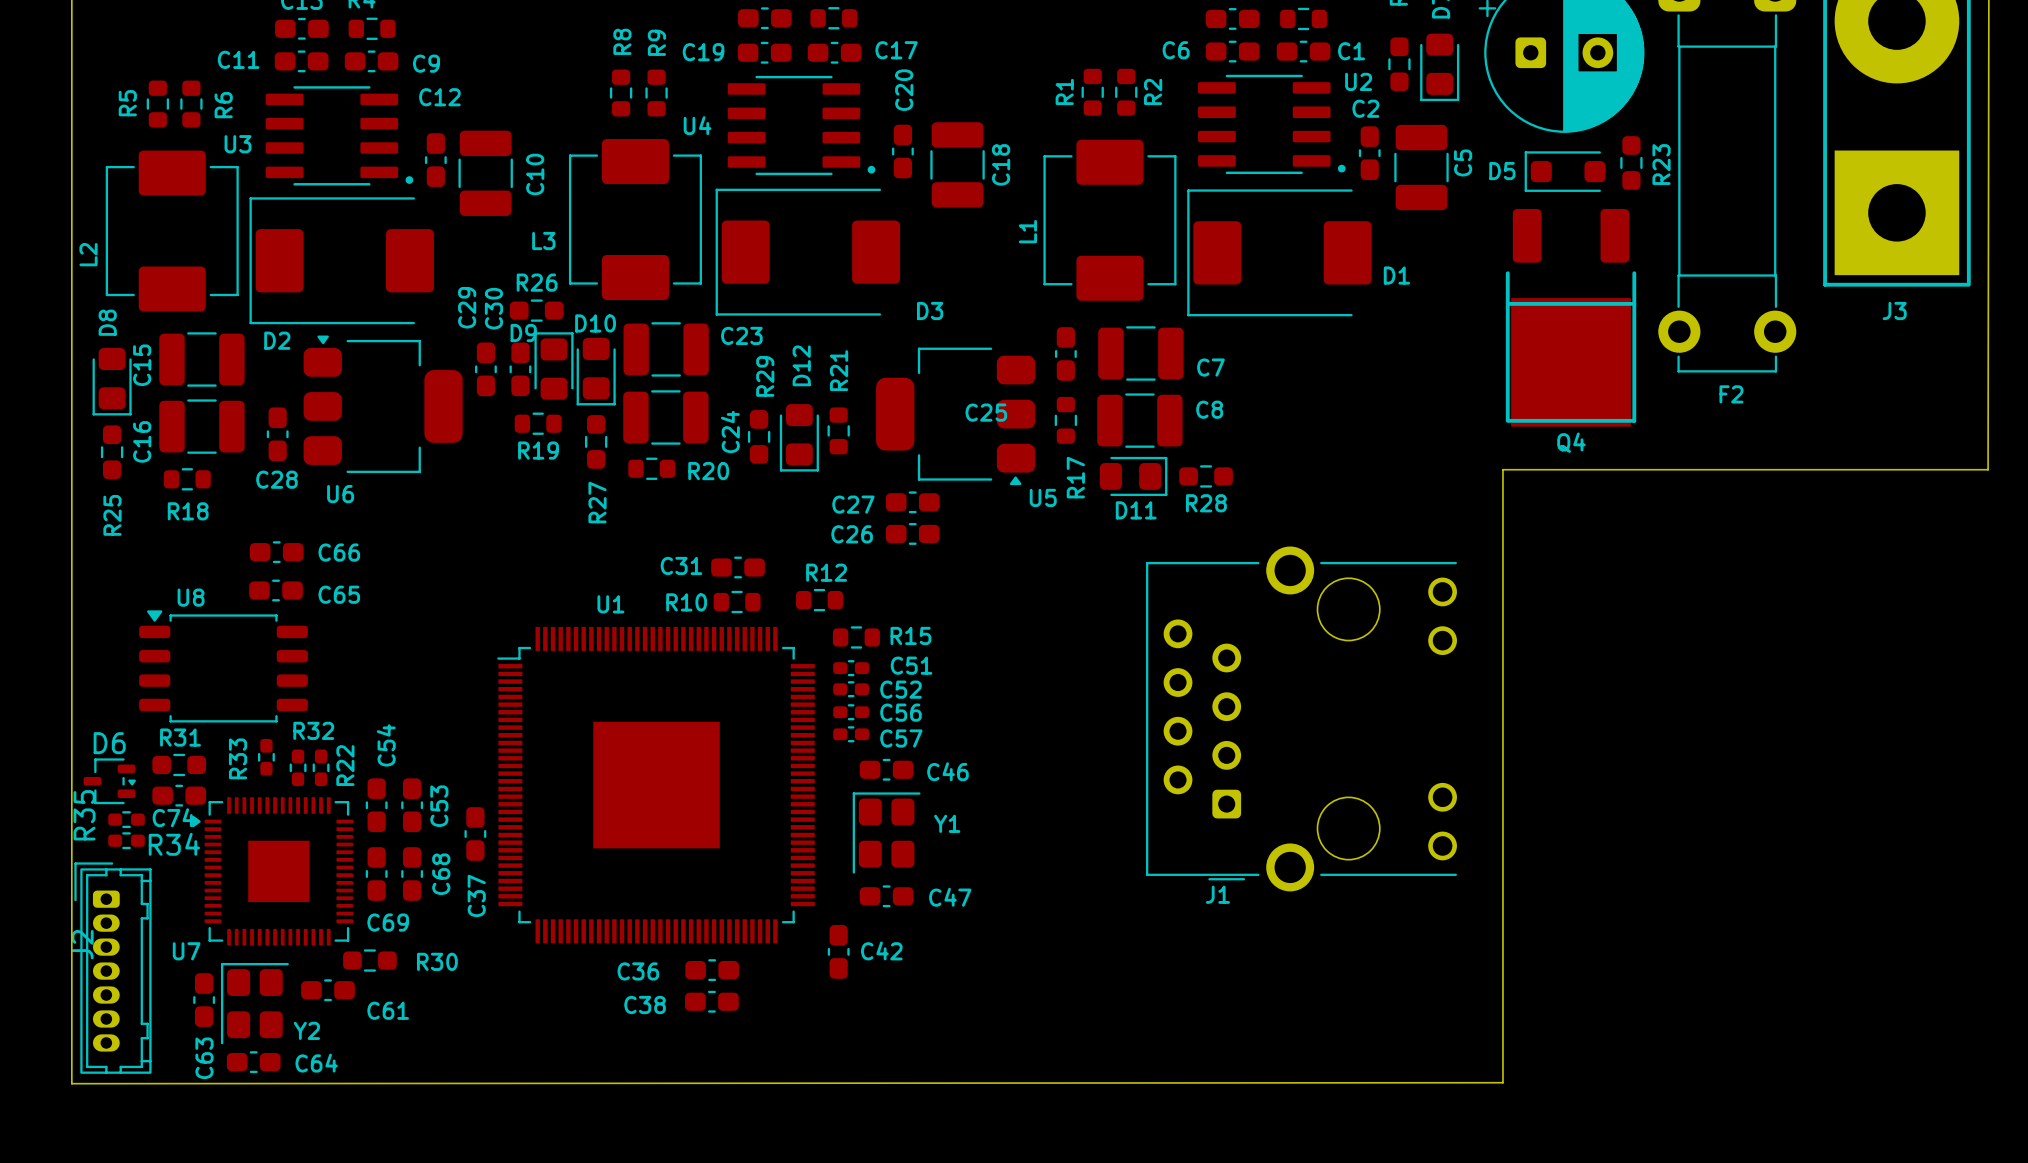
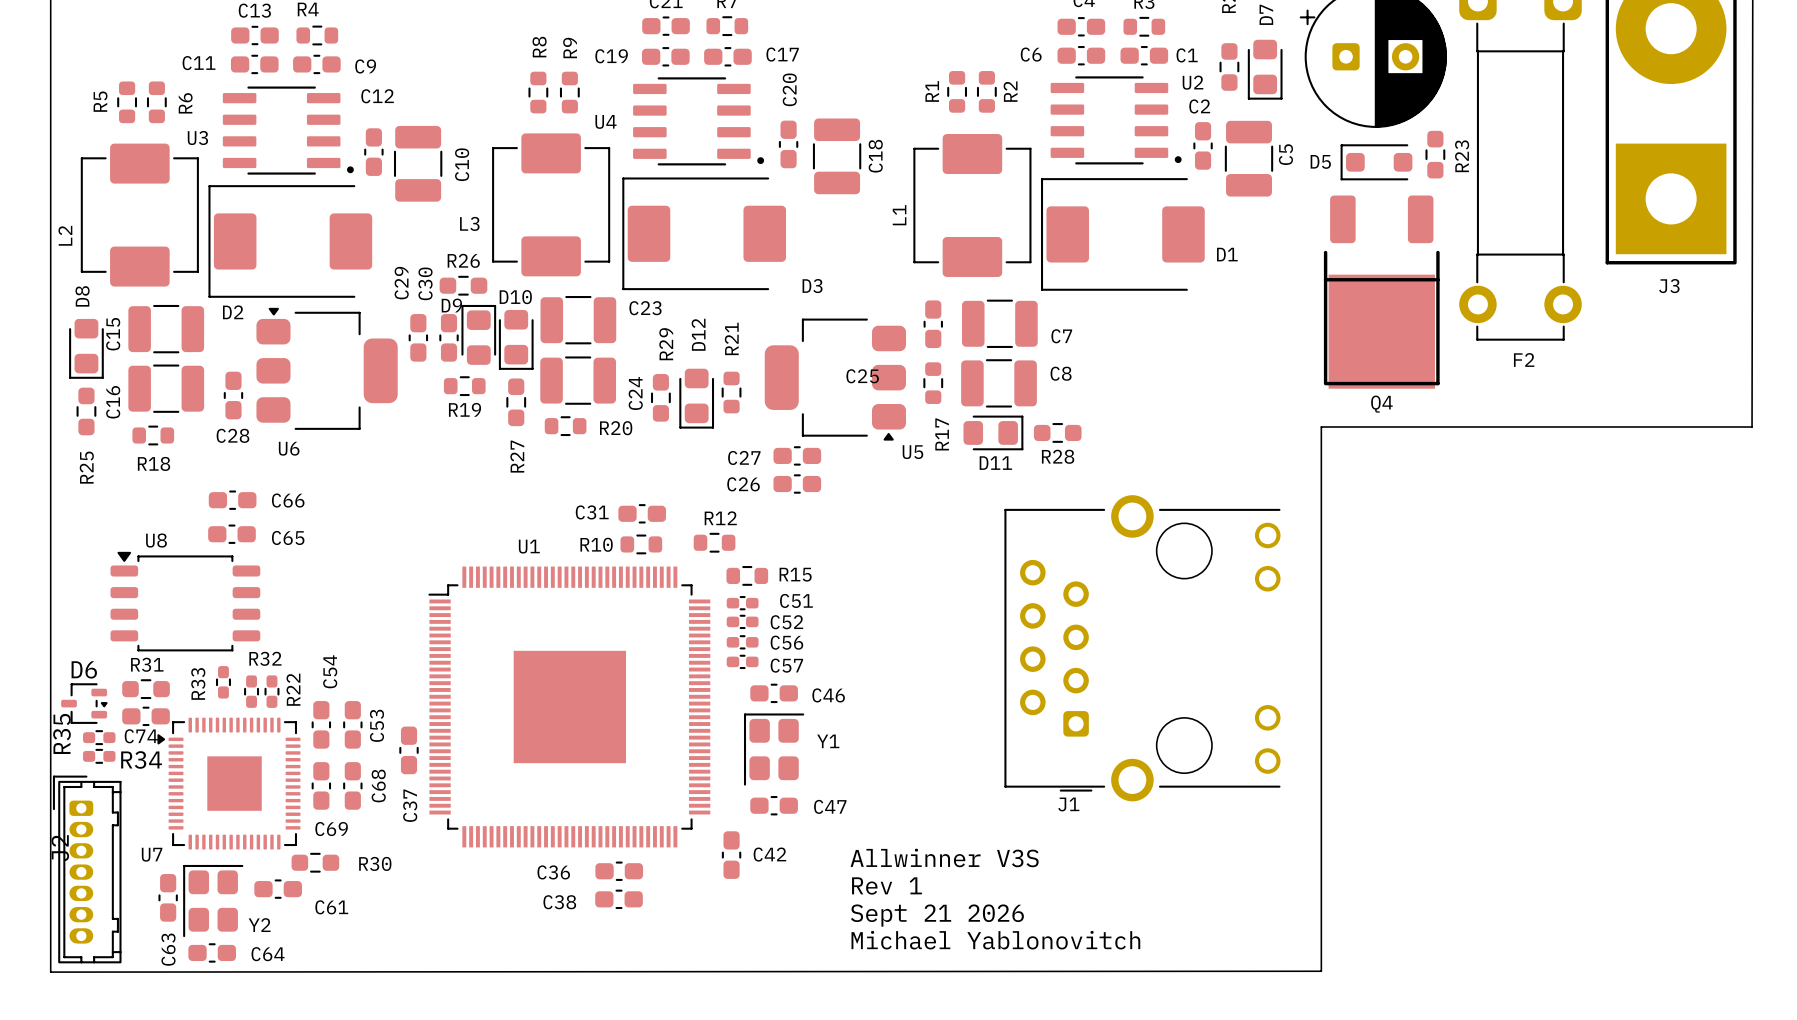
text: none -> Allwinner V3S (944, 857)
text: none -> Rev 1 (886, 885)
text: none -> Sept 21 2026 (937, 915)
text: none -> Michael Yablonovitch (995, 940)

